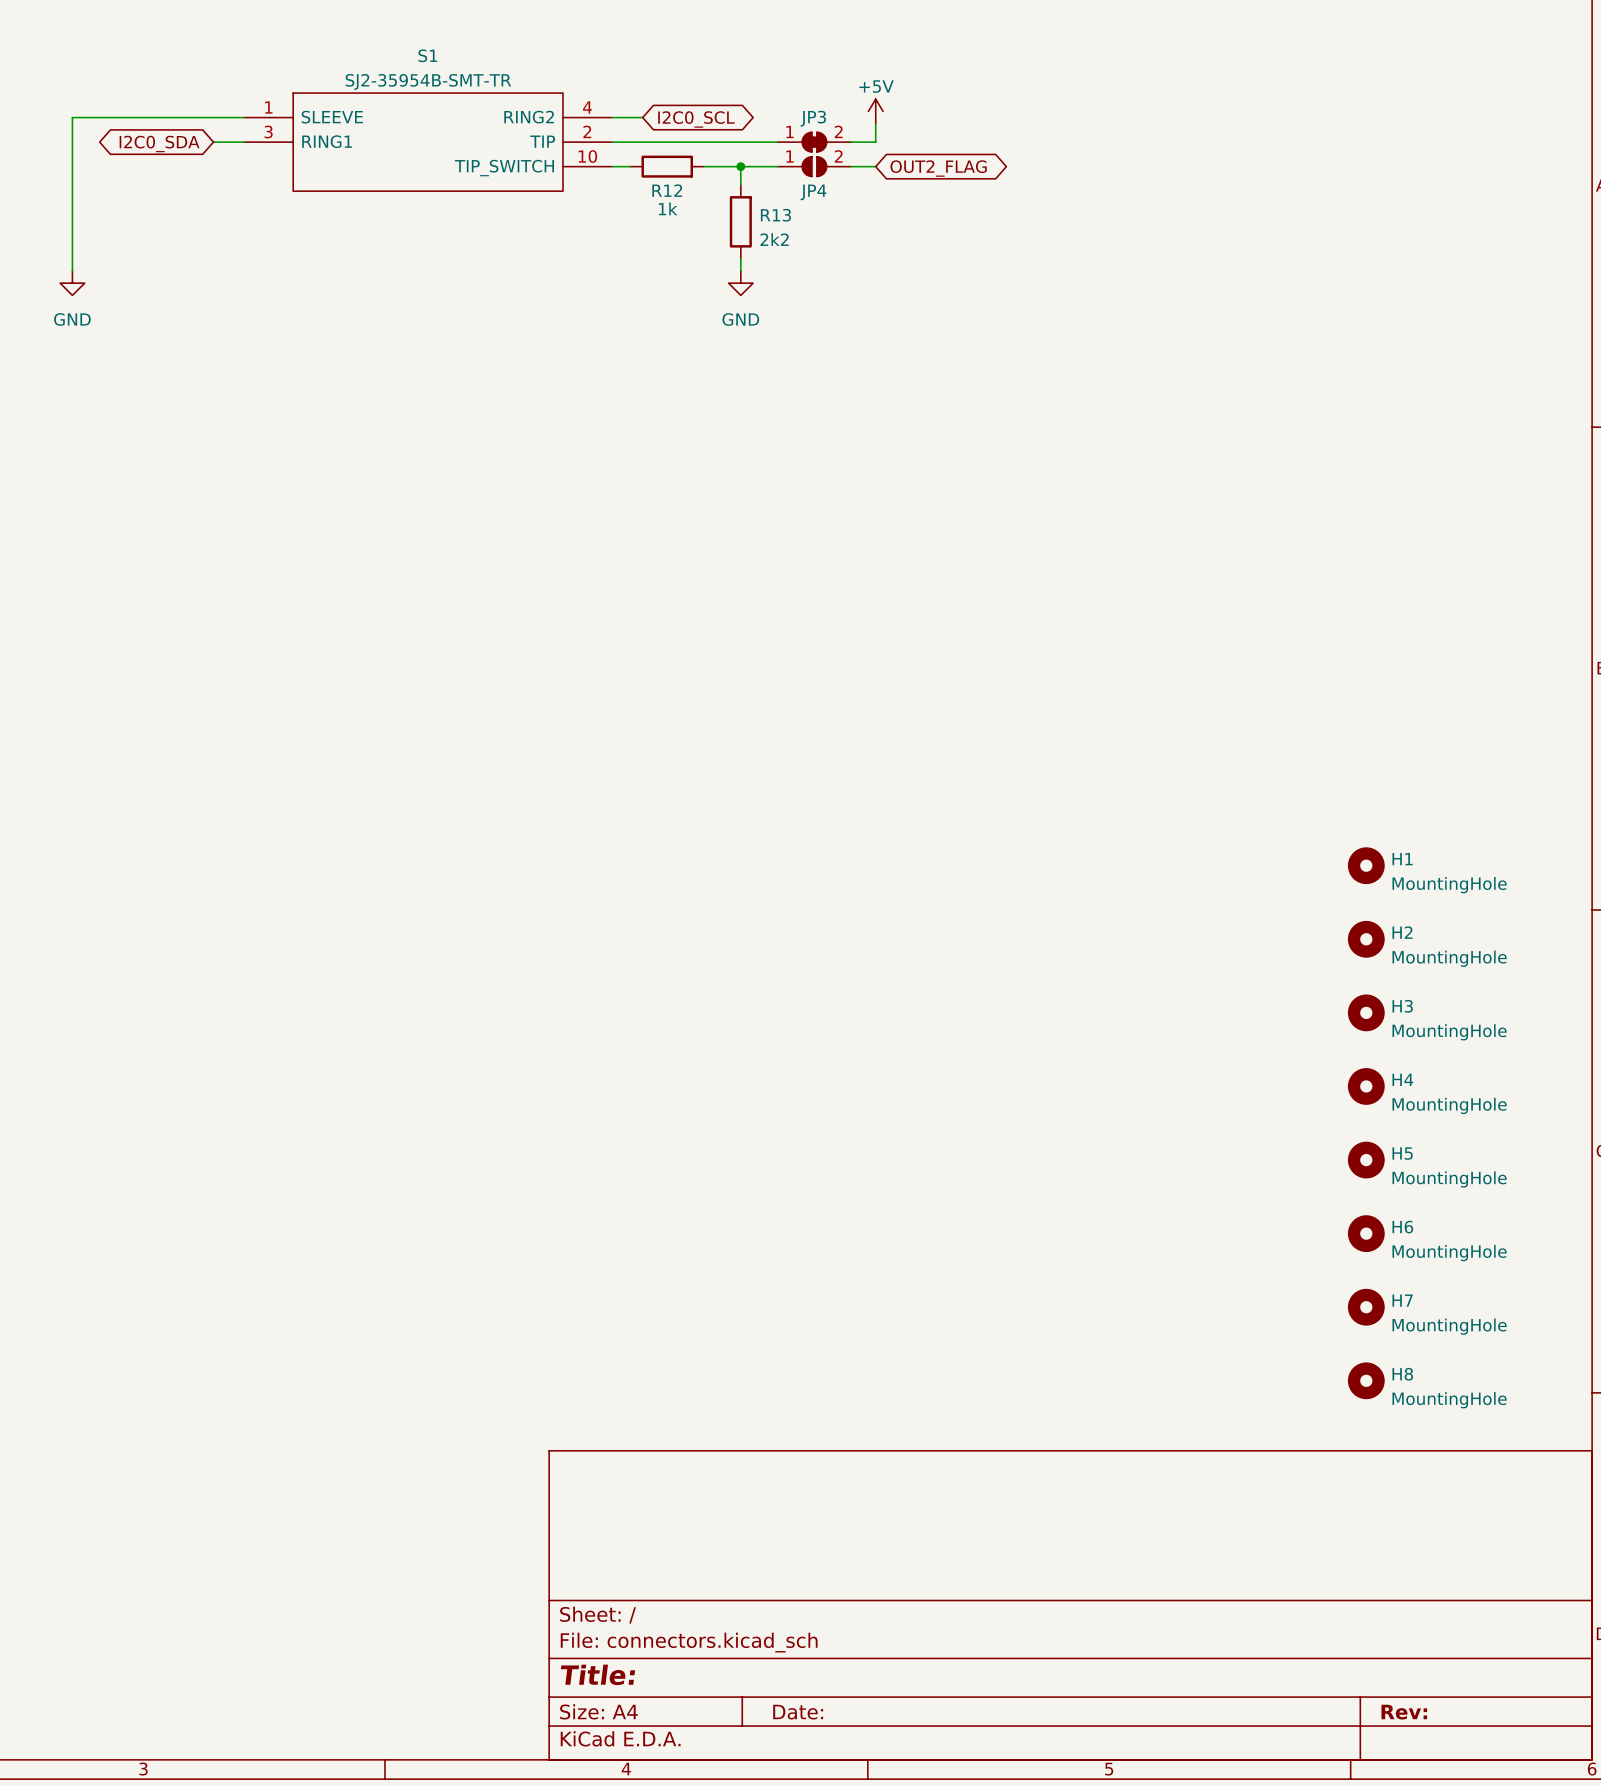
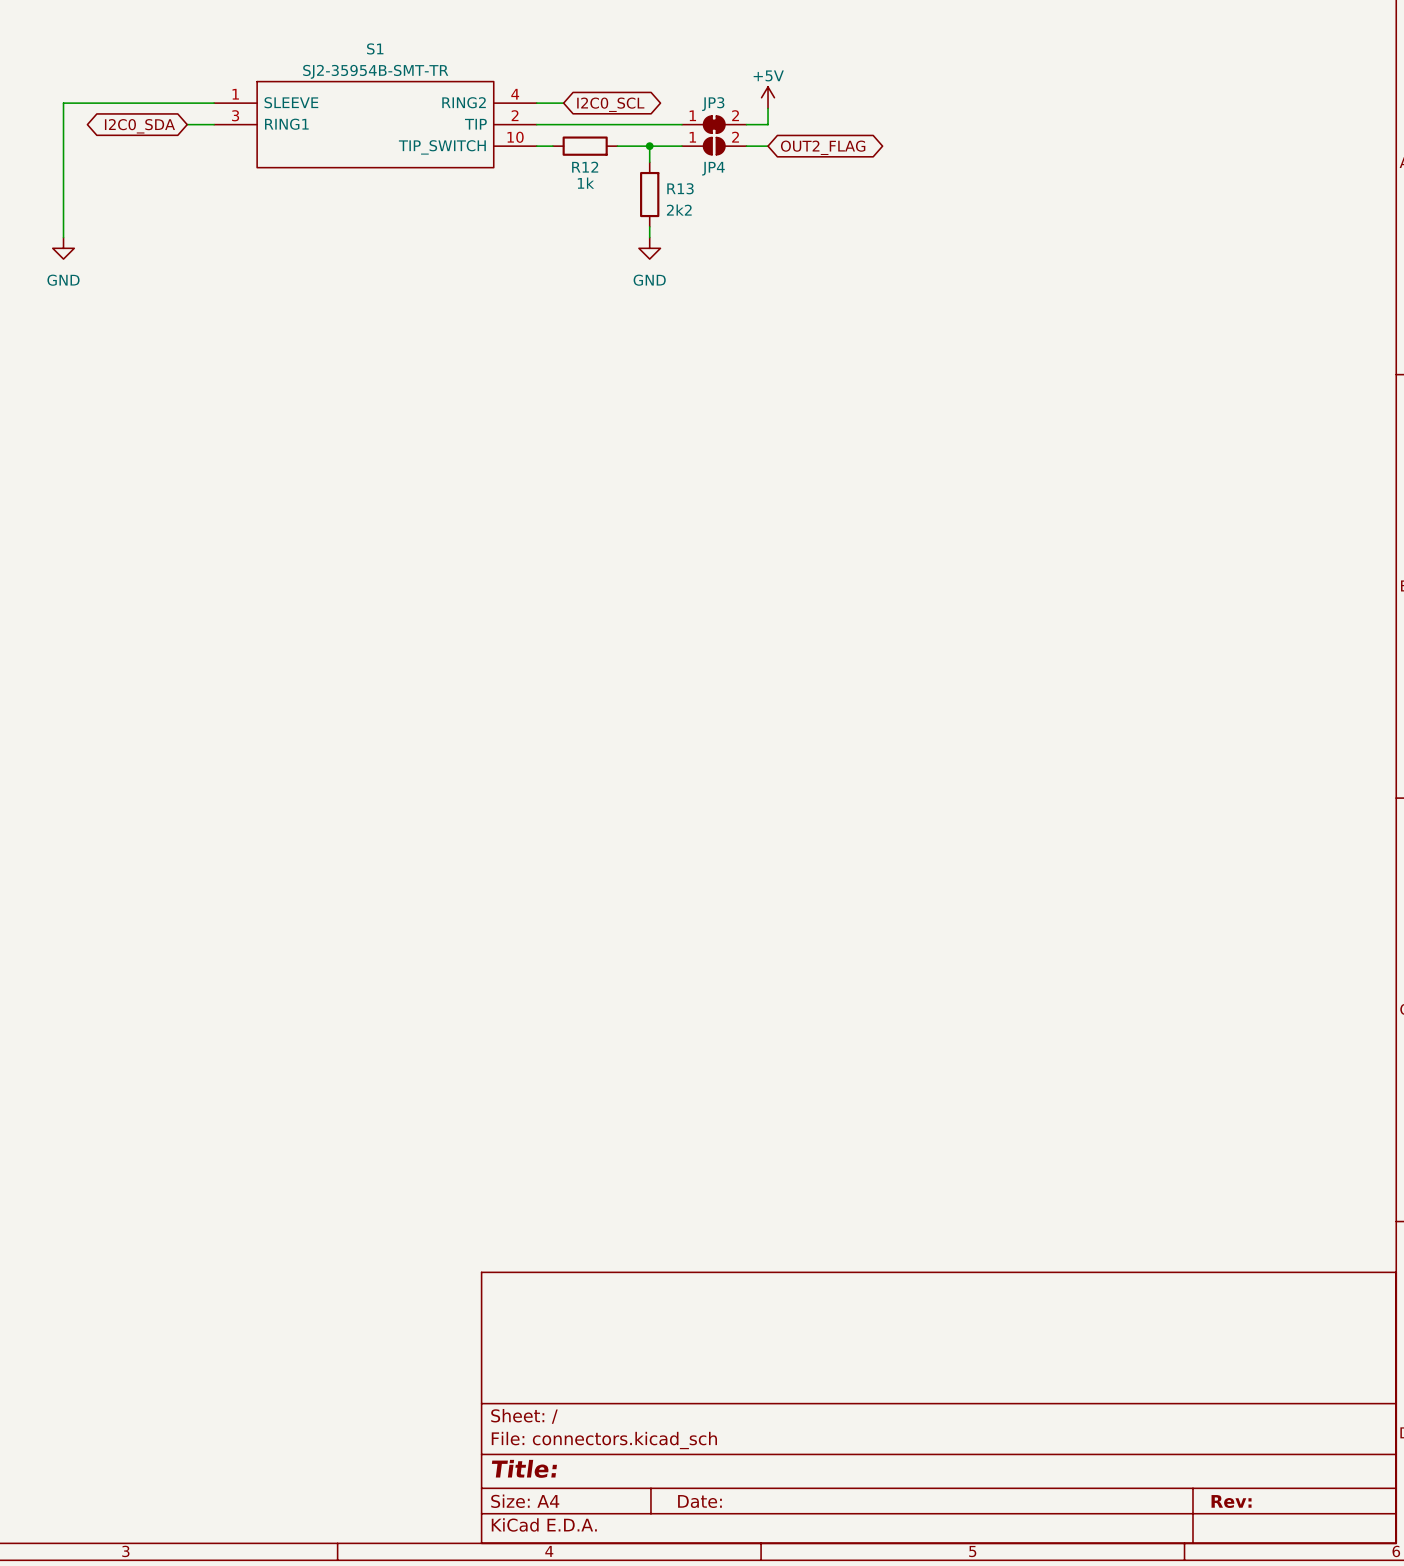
H1: MountingHole (1366, 865) -> none
H2: MountingHole (1366, 939) -> none
H3: MountingHole (1366, 1012) -> none
H4: MountingHole (1366, 1086) -> none
H5: MountingHole (1366, 1160) -> none
H6: MountingHole (1366, 1233) -> none
H7: MountingHole (1366, 1307) -> none
H8: MountingHole (1366, 1380) -> none

